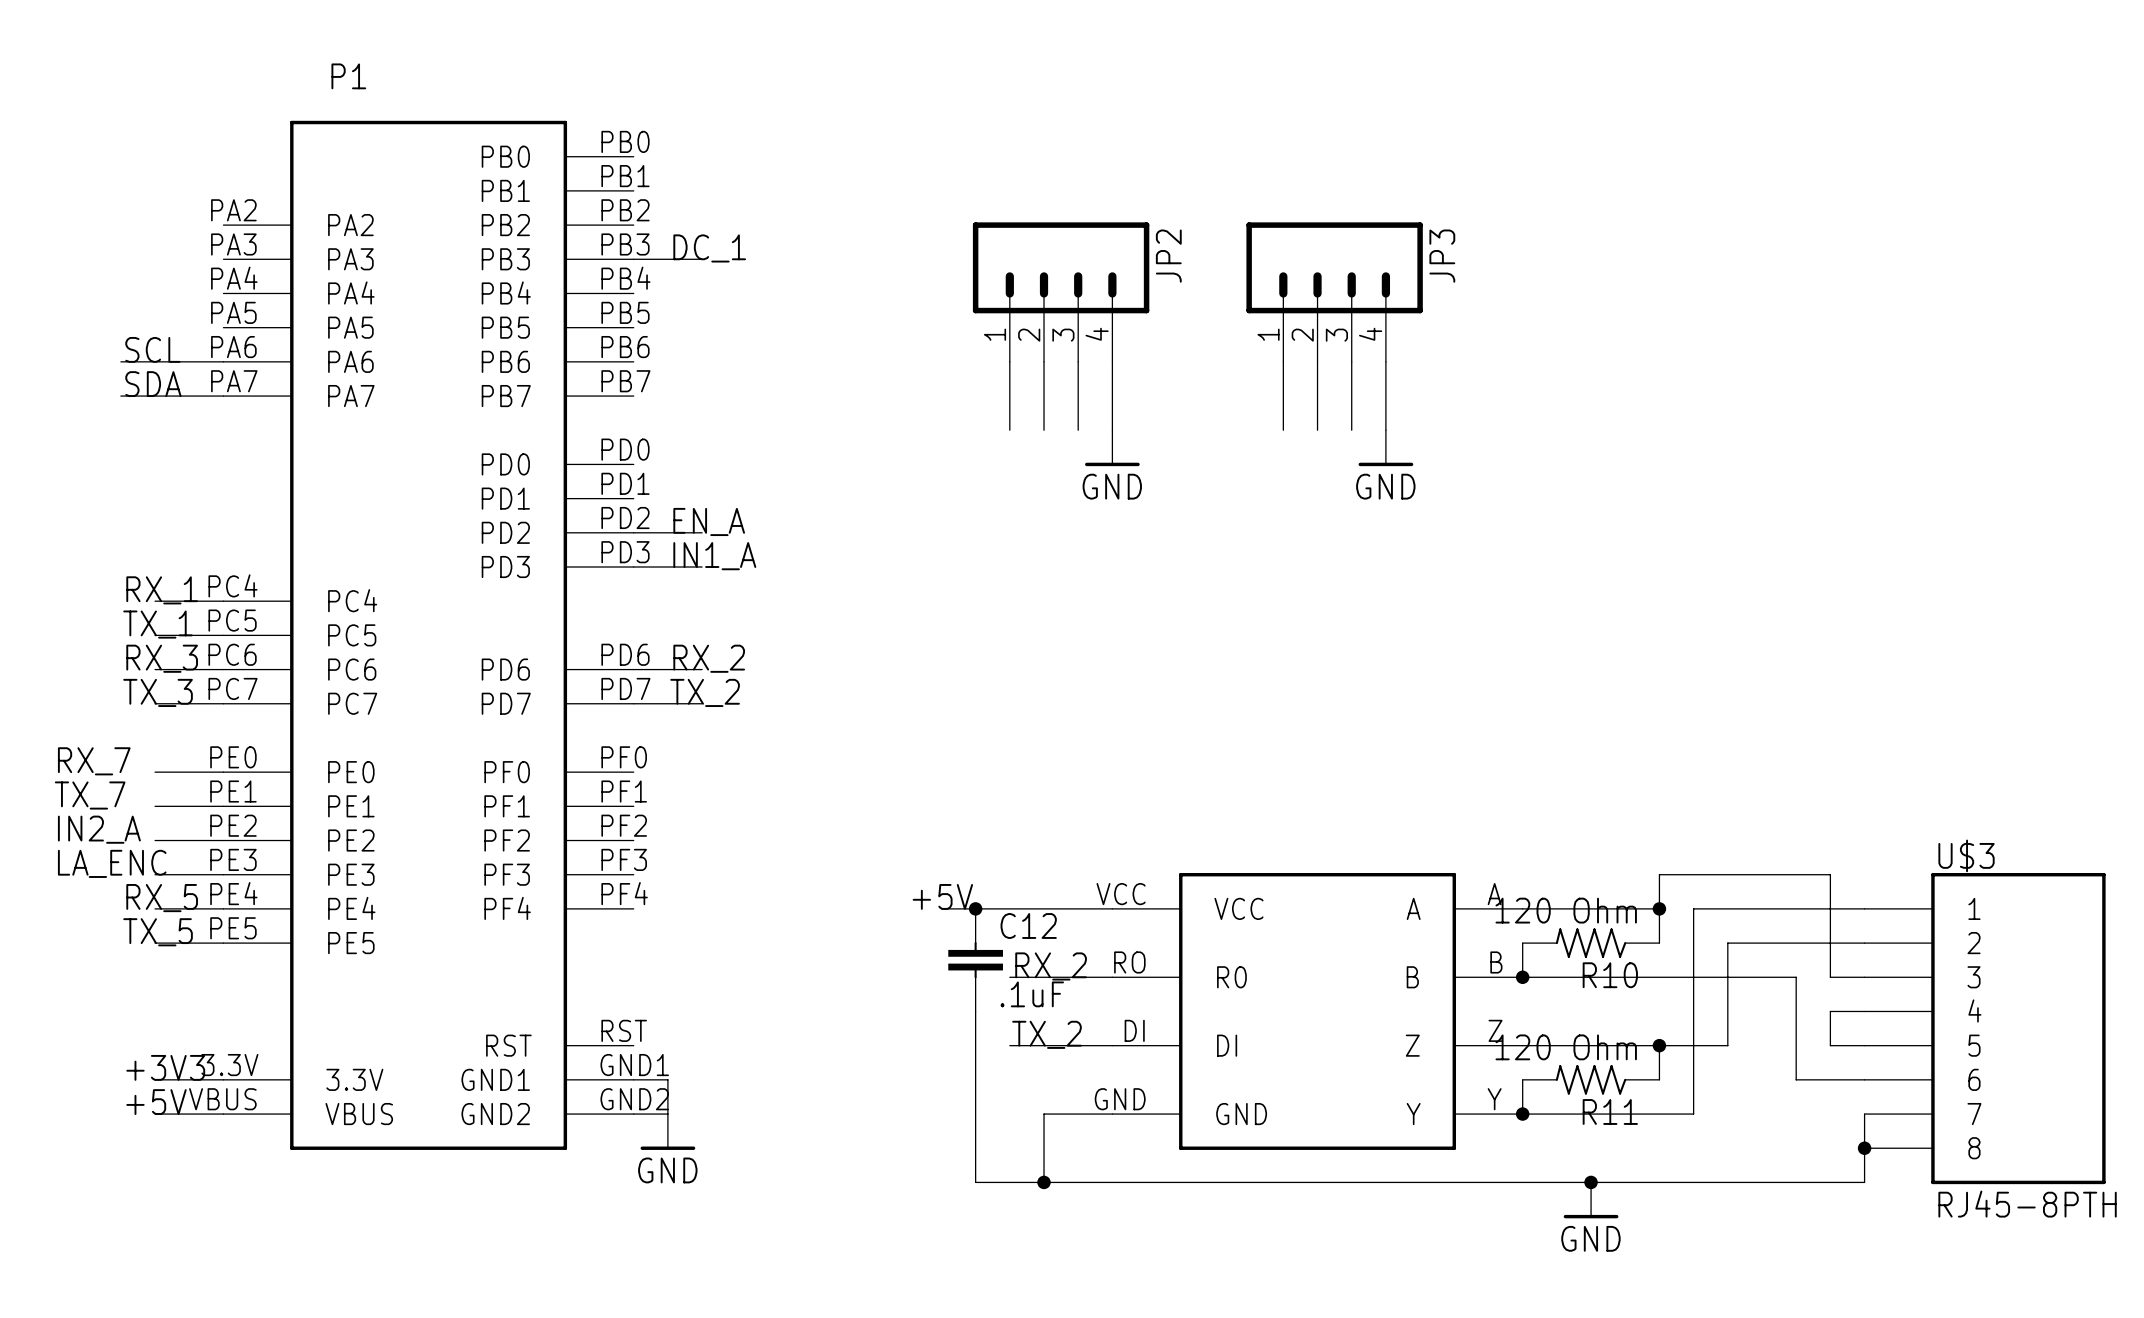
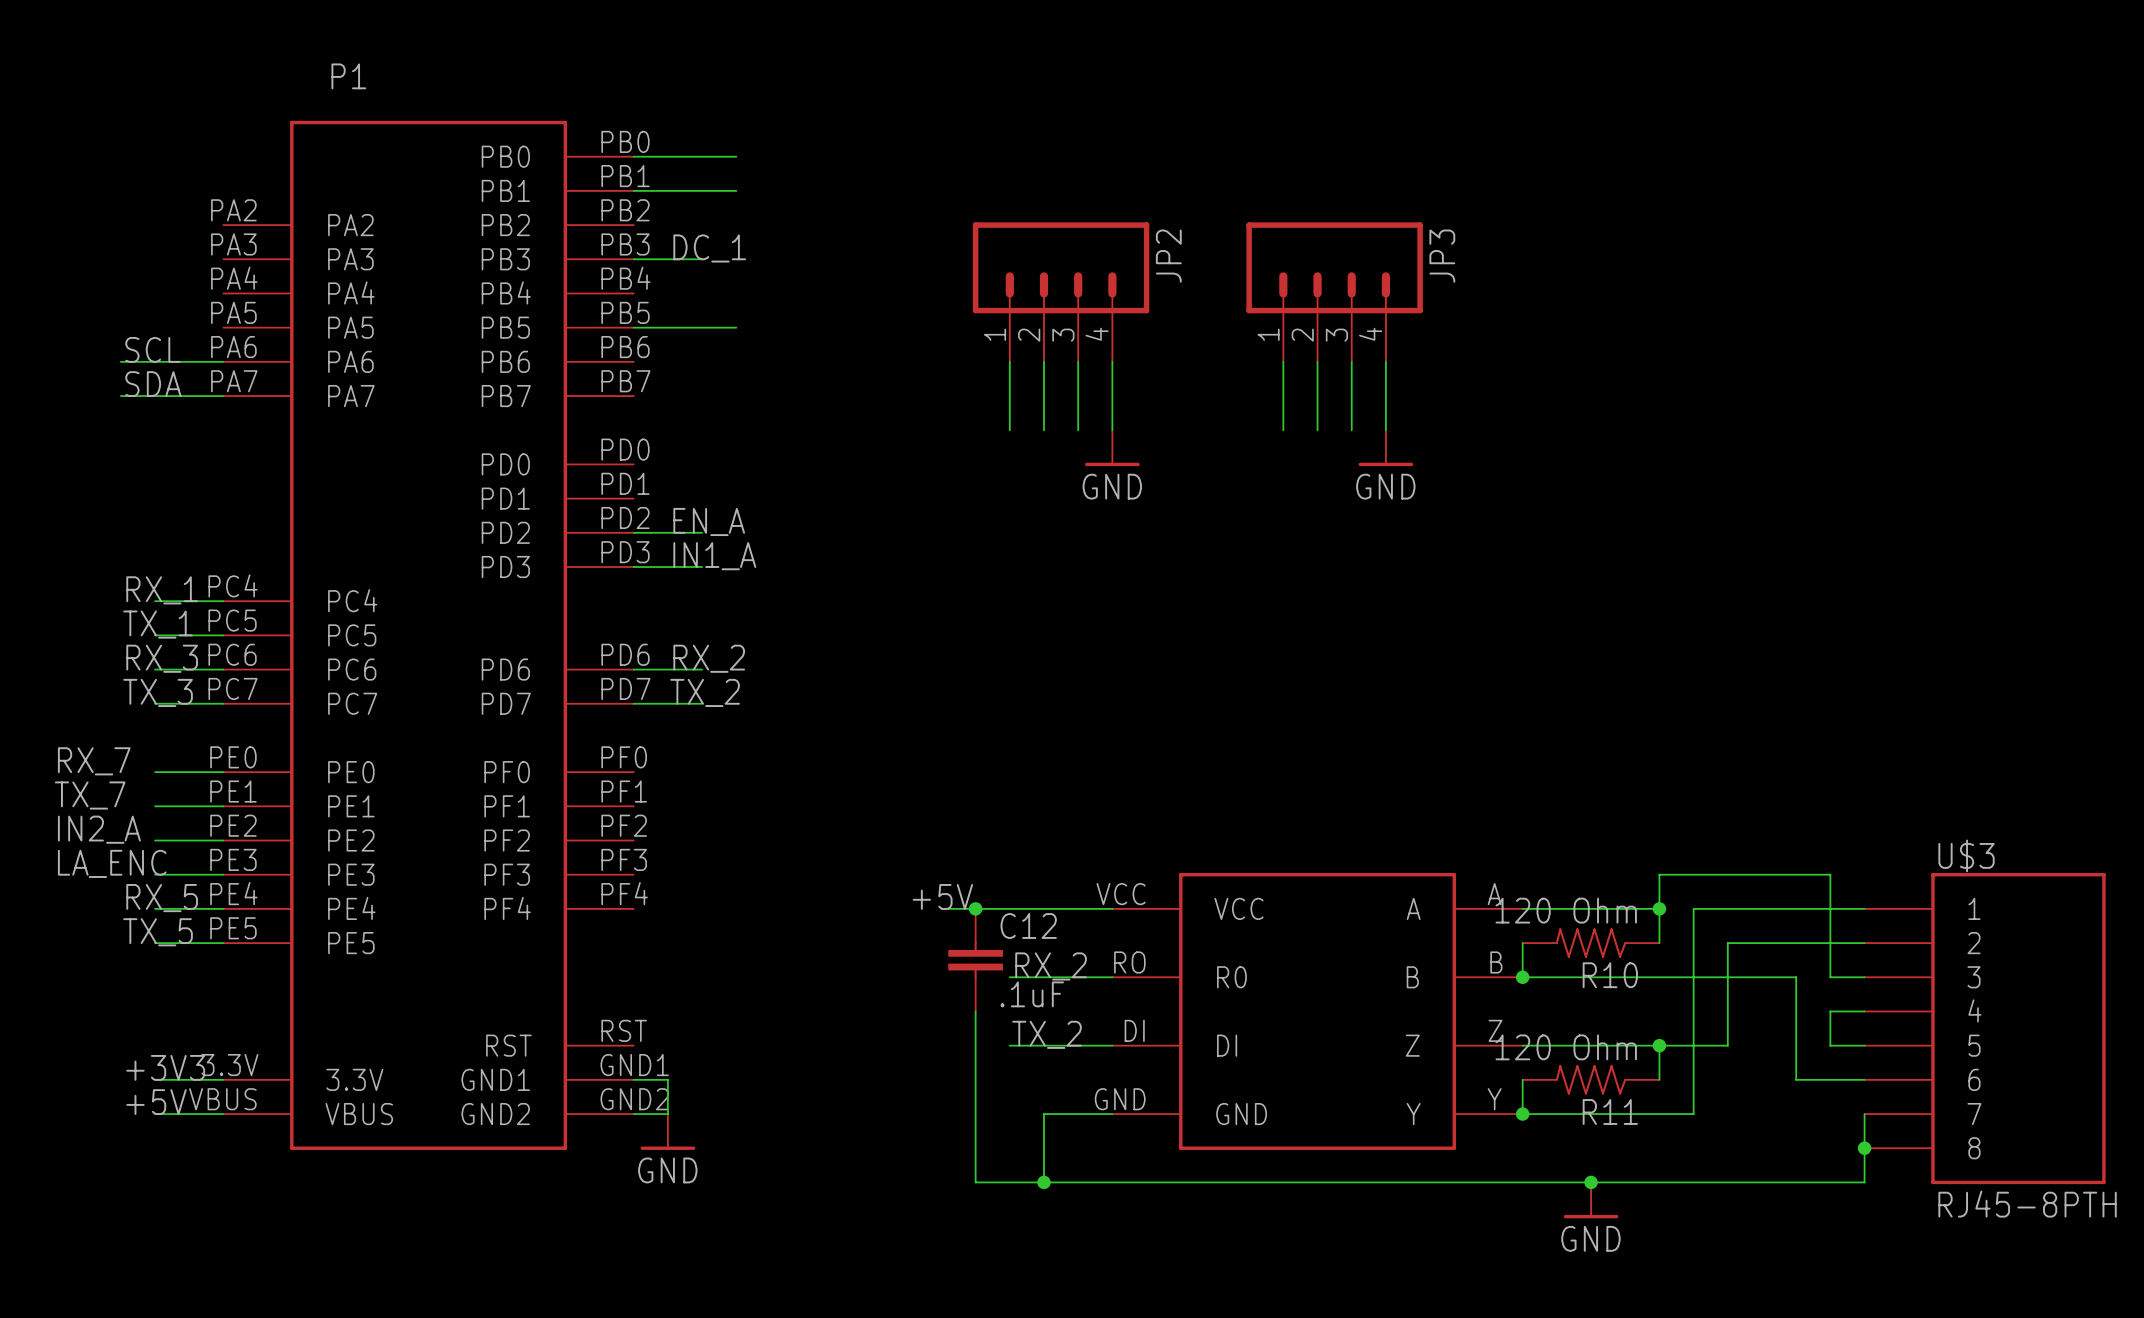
wire: none -> (633, 156) (736, 156)
wire: none -> (633, 190) (736, 190)
wire: none -> (633, 327) (736, 327)

